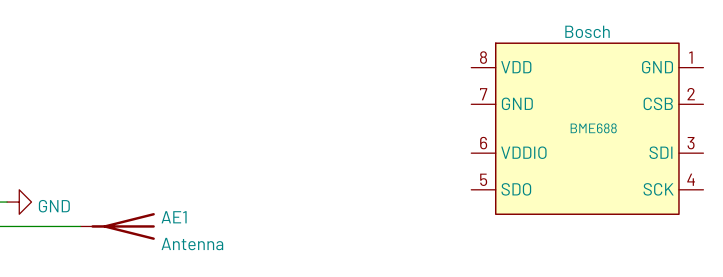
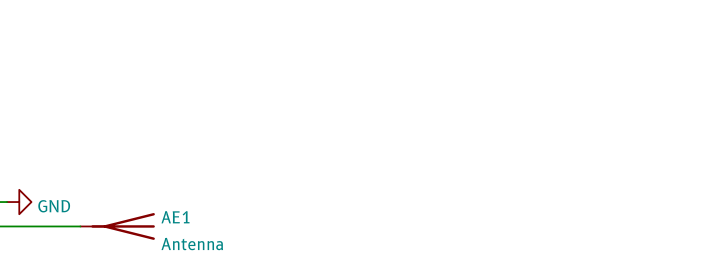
BME688: Bosch (587, 128) -> none

